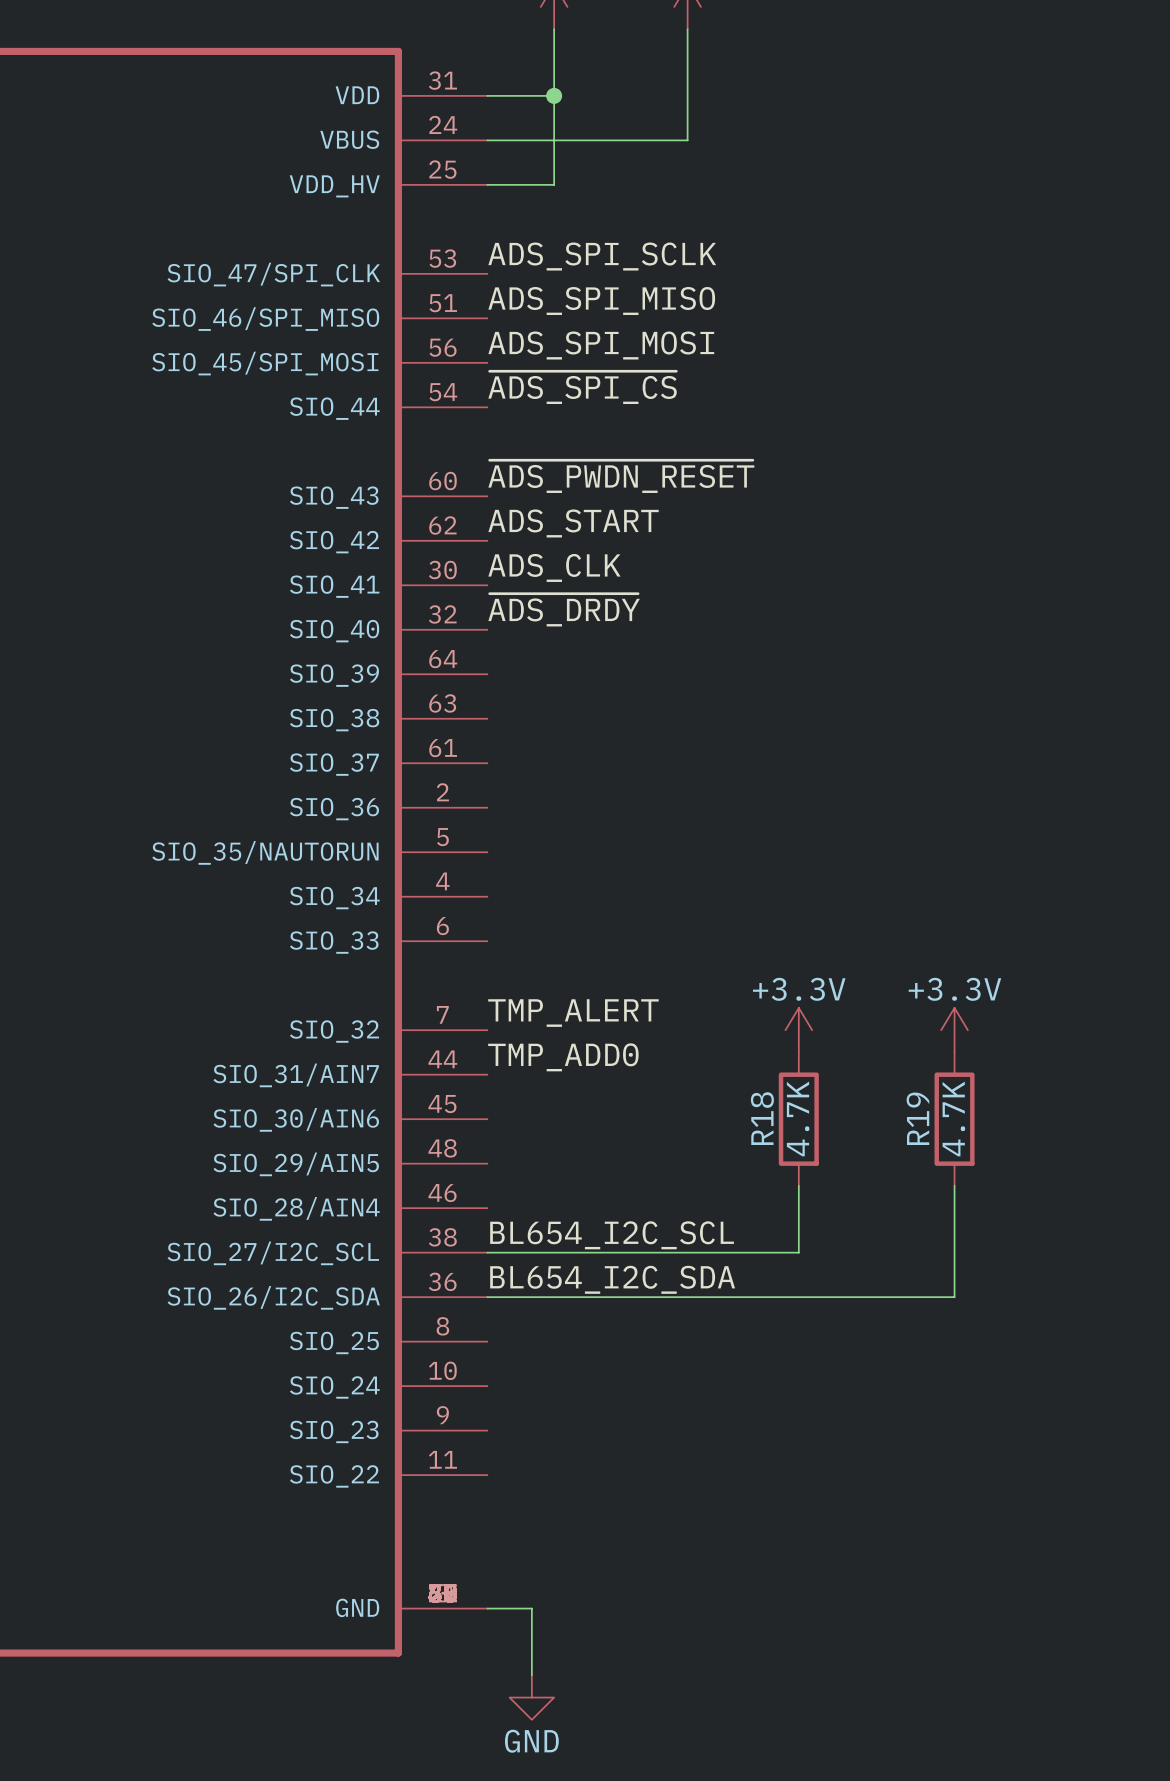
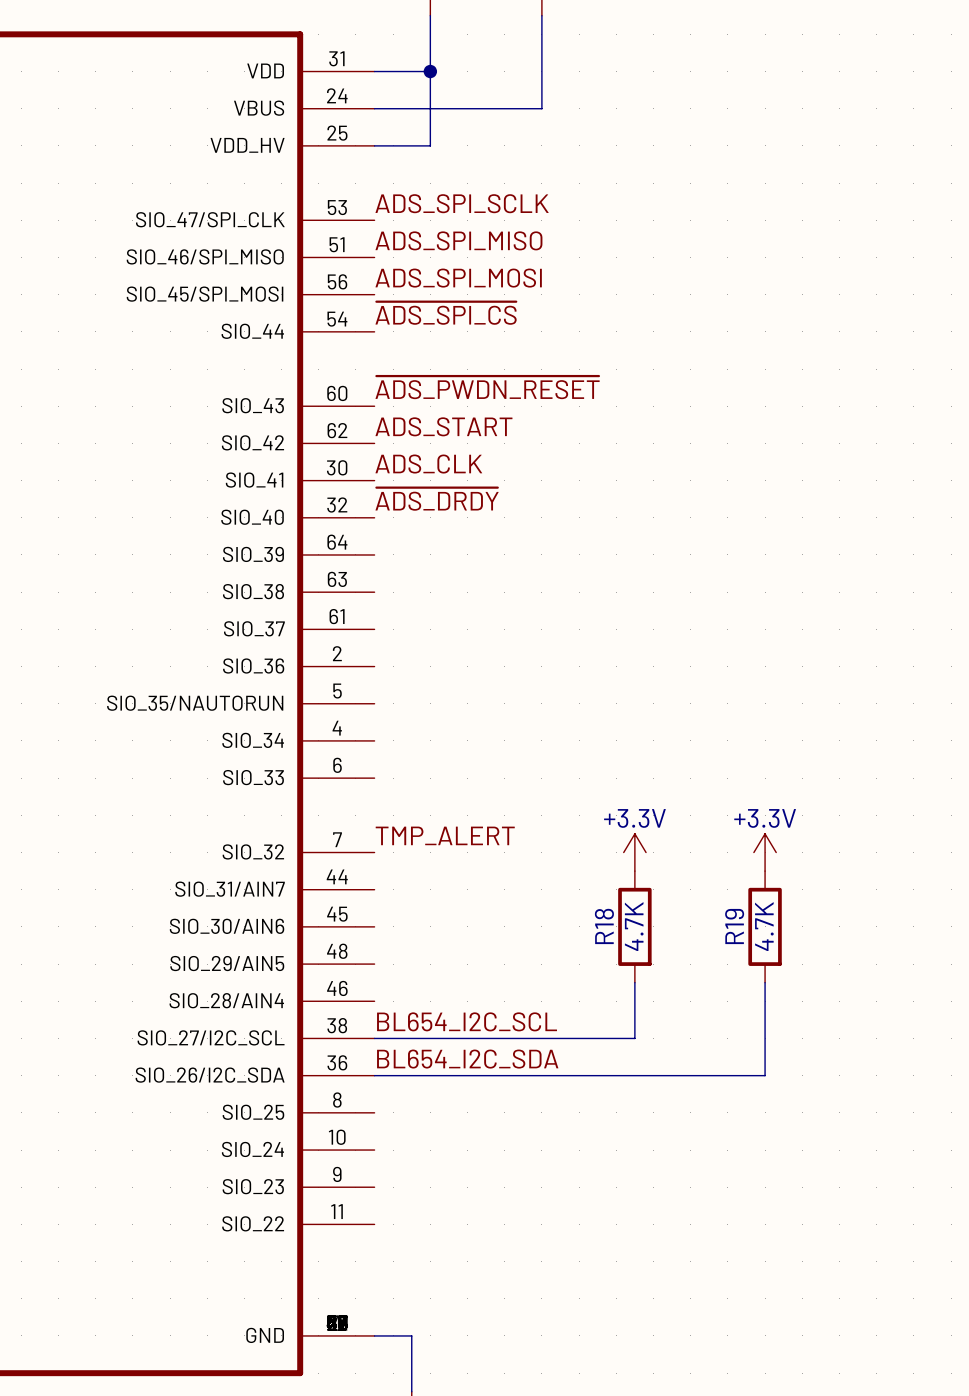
label: TMP_ADD0 (563, 1057) -> none

